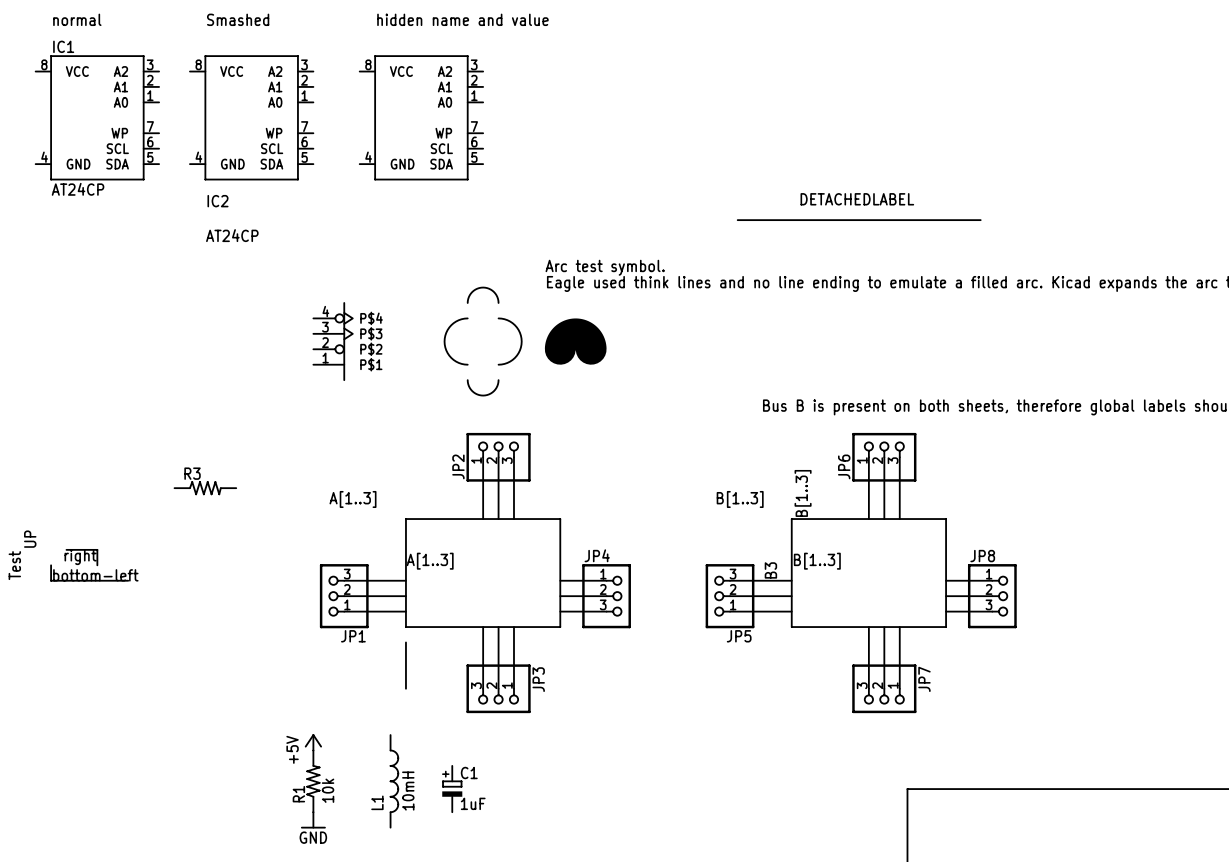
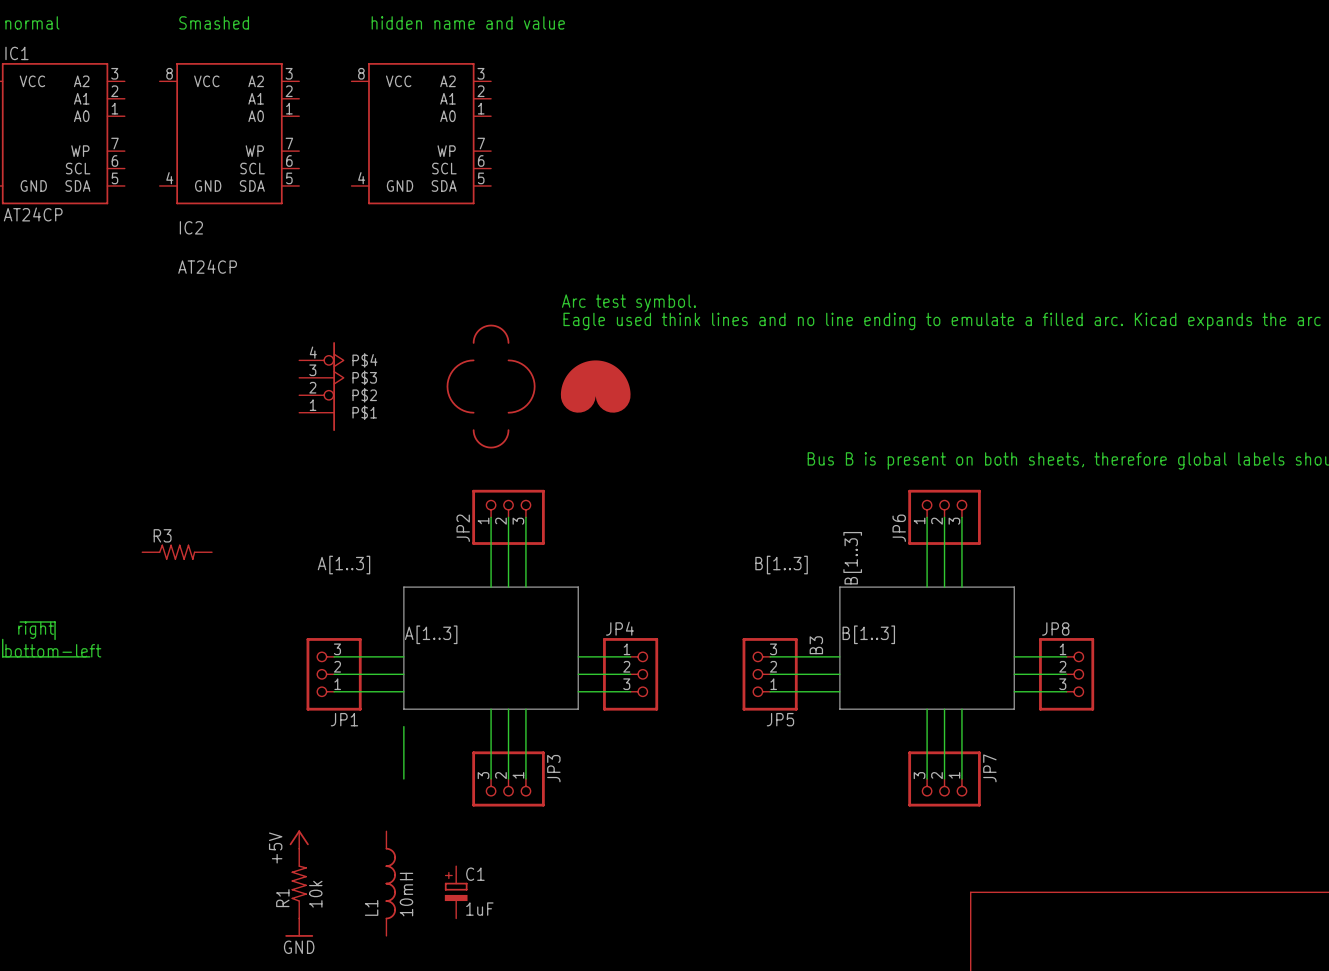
label: DETACHEDLABEL (857, 199) -> none
wire: (737, 220) (980, 220) -> none

